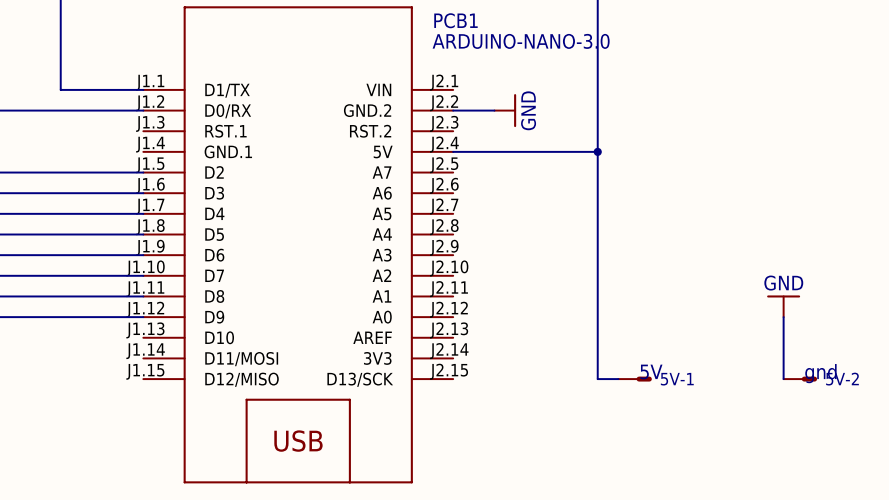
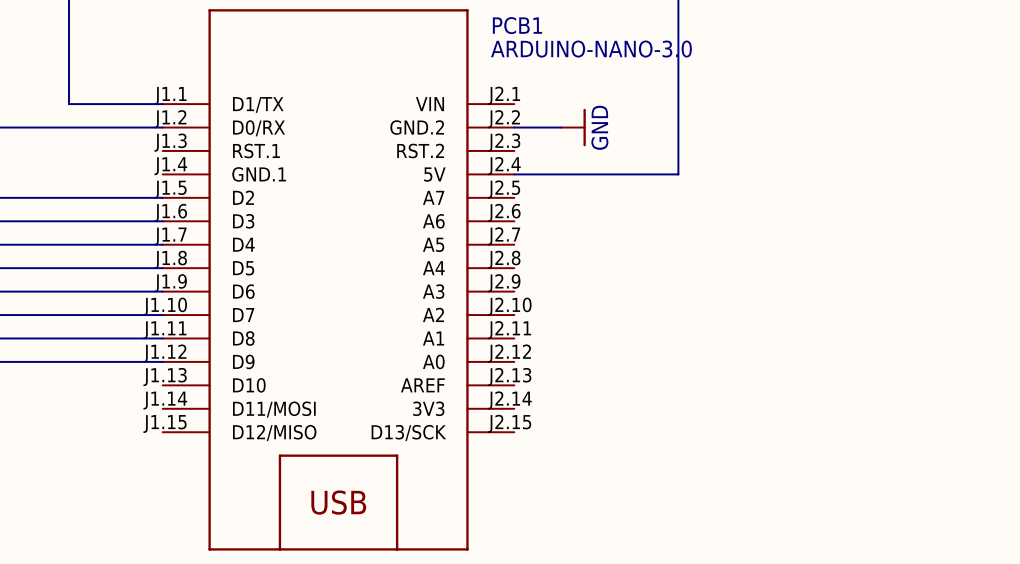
wire: (597, 151) (597, 379) (618, 379) -> none
junction: (597, 151) -> none
power symbol: GND (783, 306) -> none
wire: (783, 317) (783, 379) -> none
5V-1: (635, 379) -> none
5V-2: (800, 379) -> none

